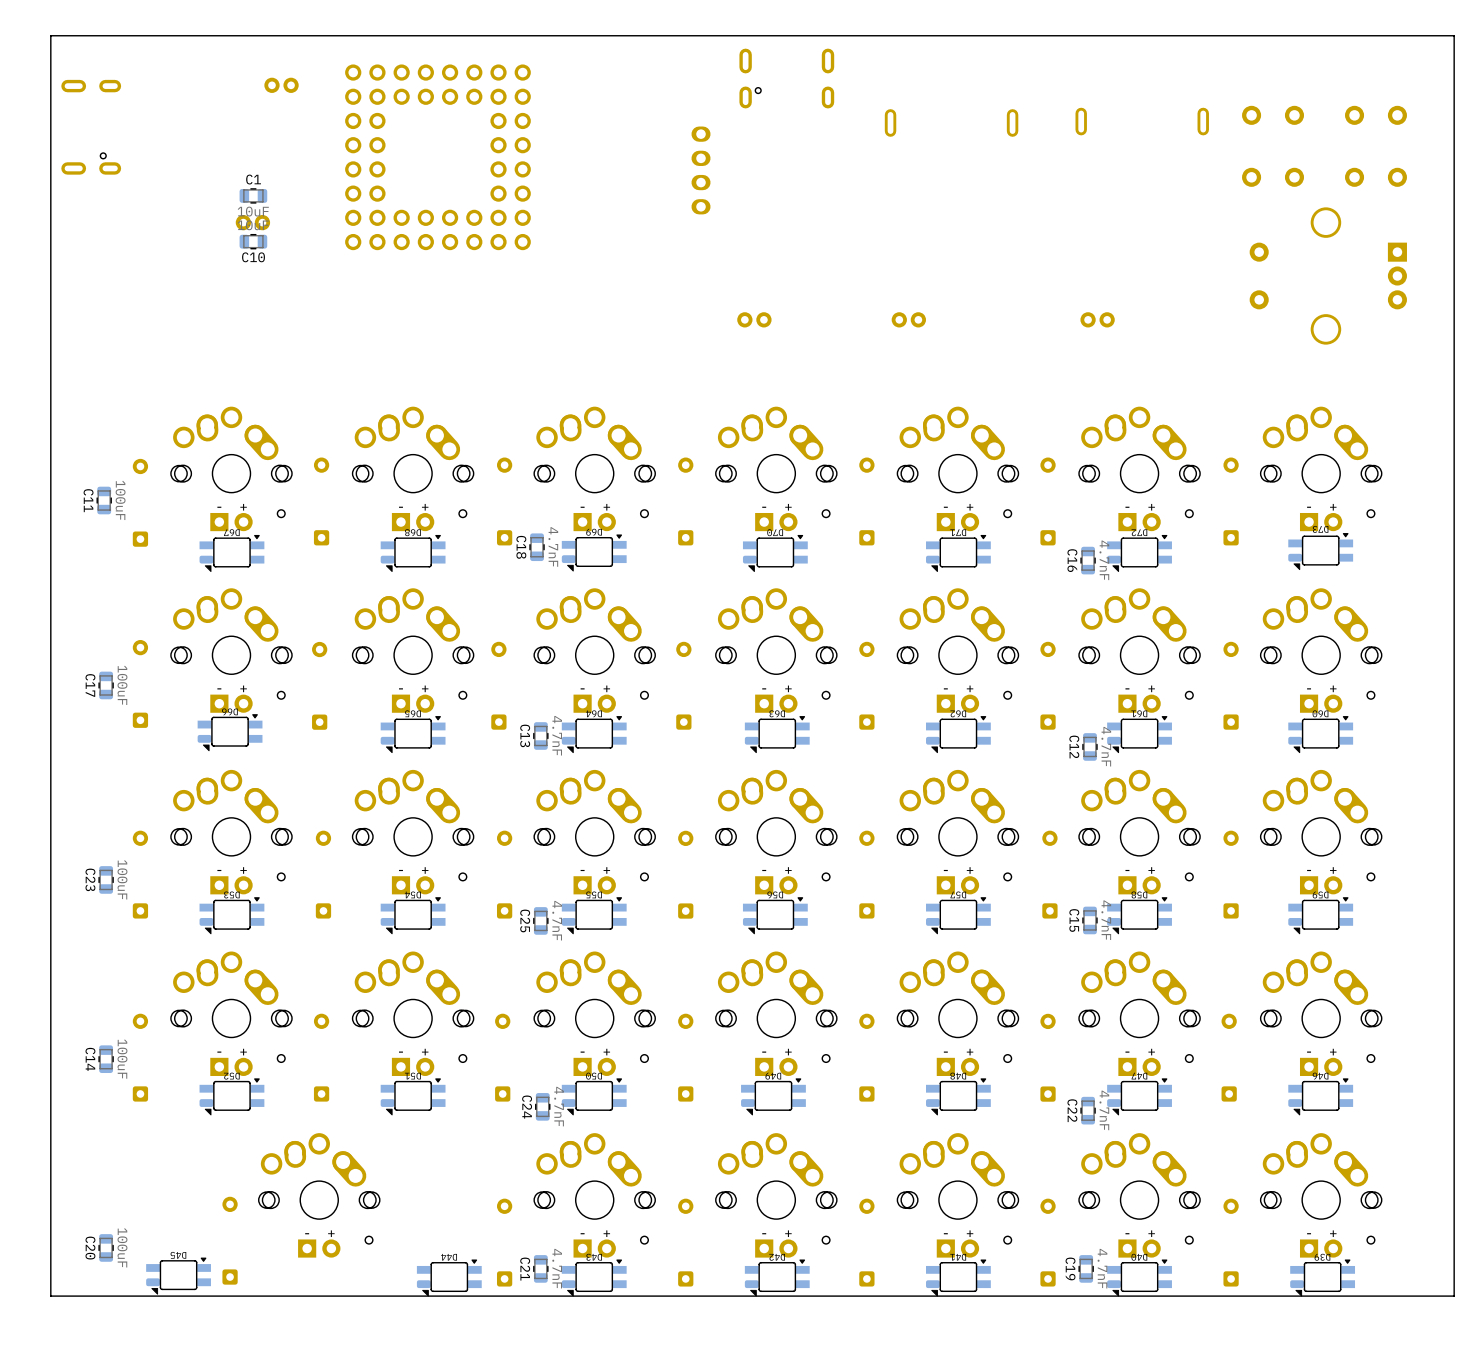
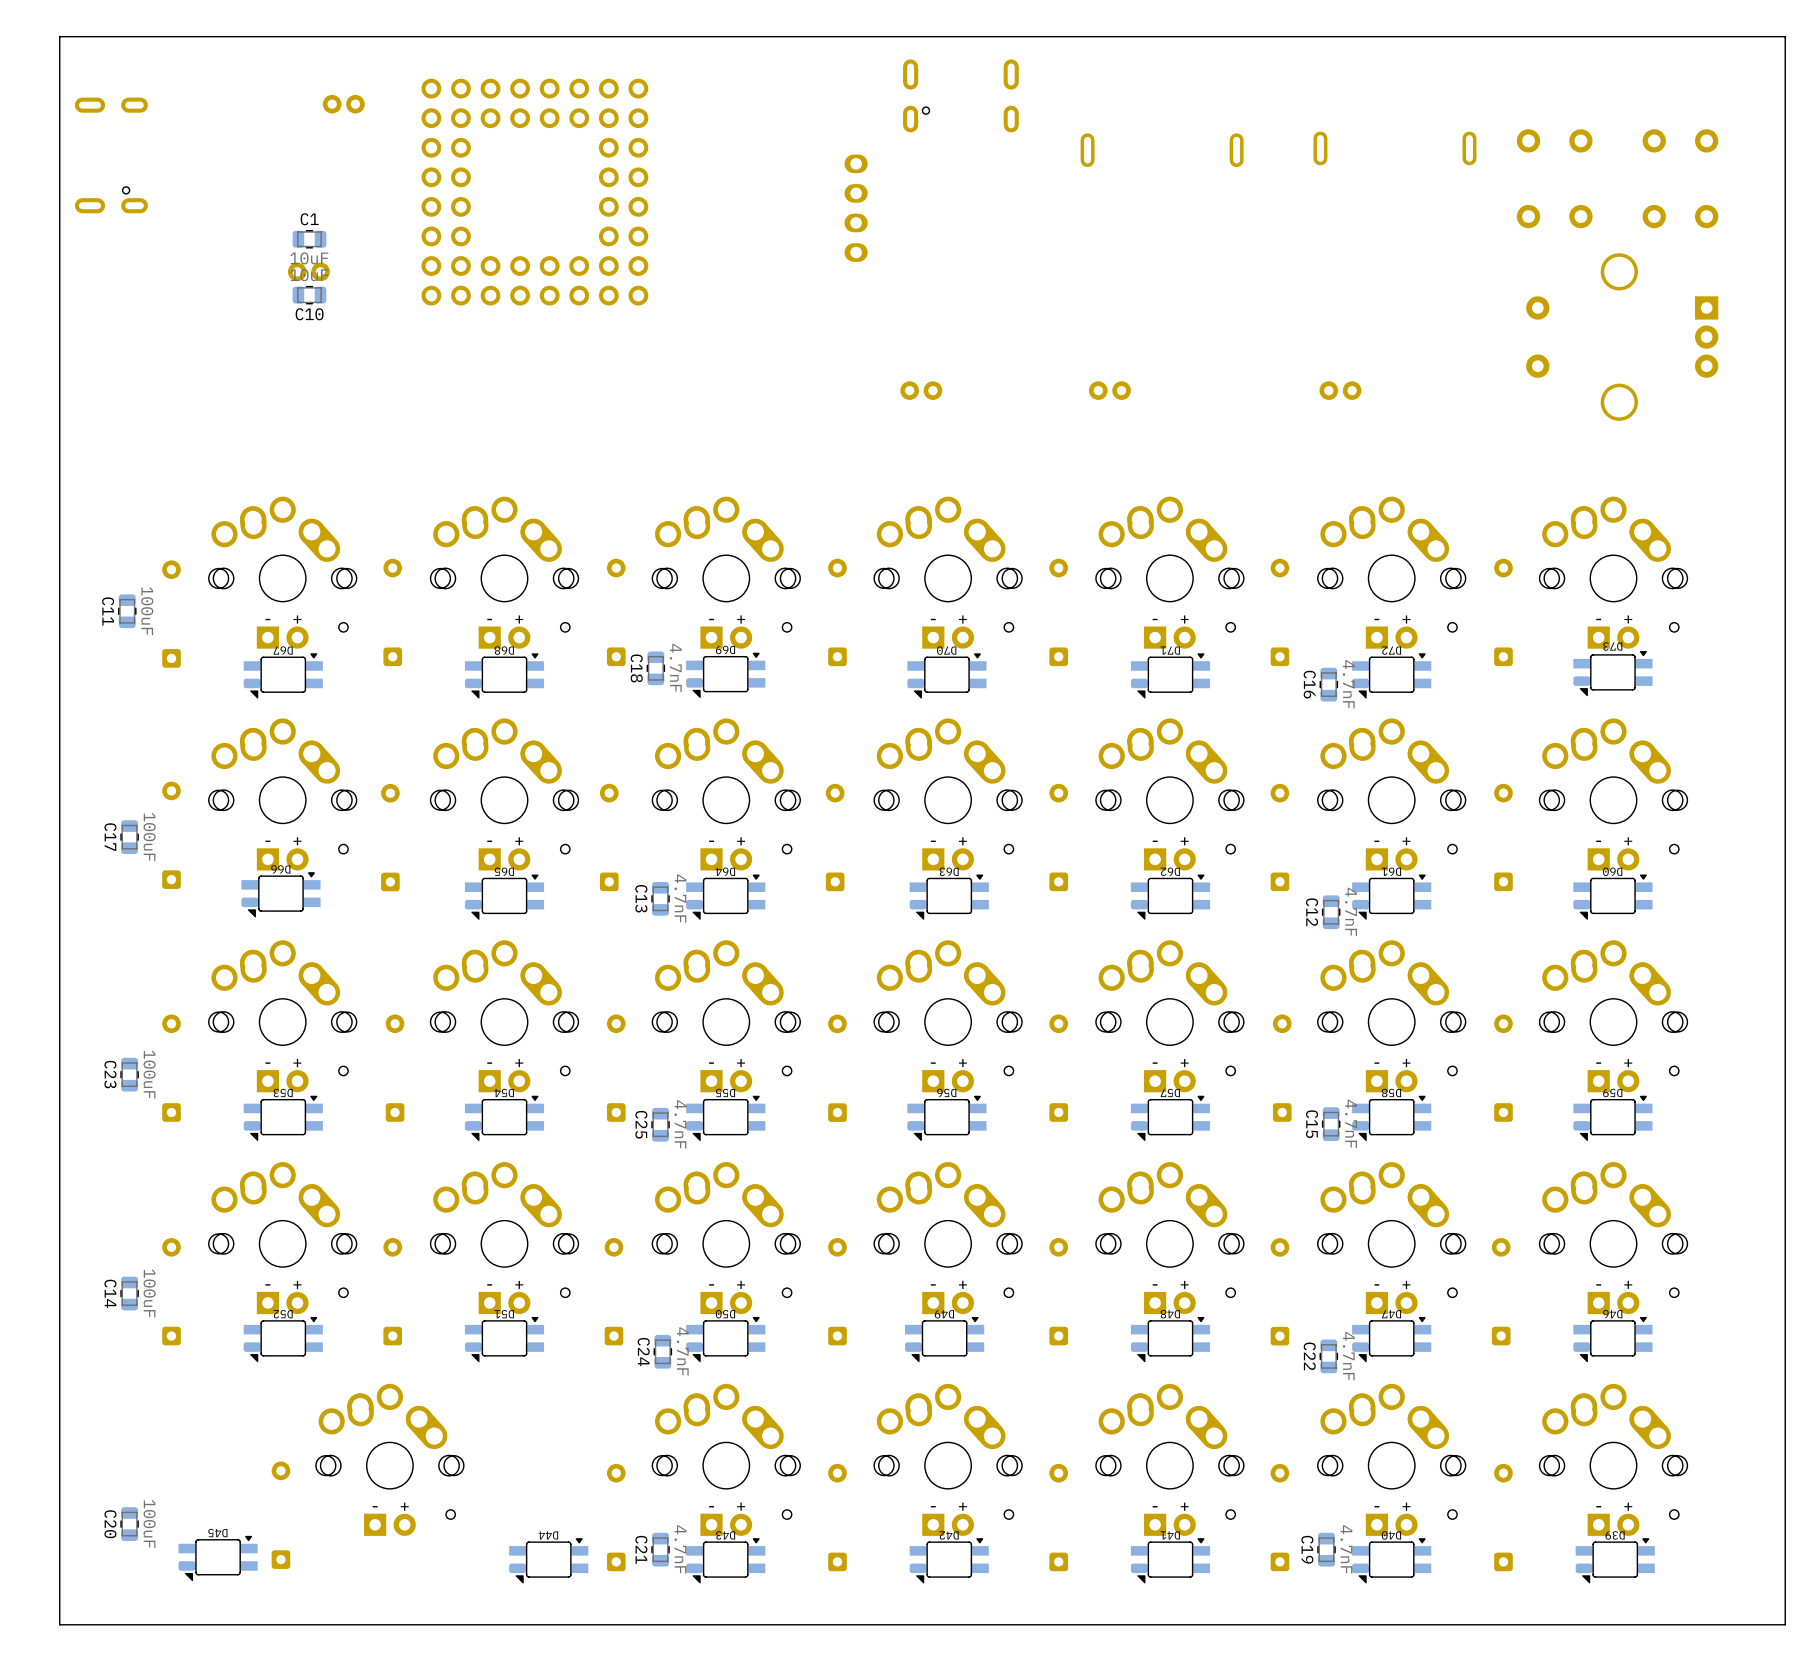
board edge: (1454, 35) (50, 35) (50, 1296) (1454, 1296) (1454, 35) -> (1785, 36) (1785, 1624) (59, 1624) (59, 36) (1785, 36)

